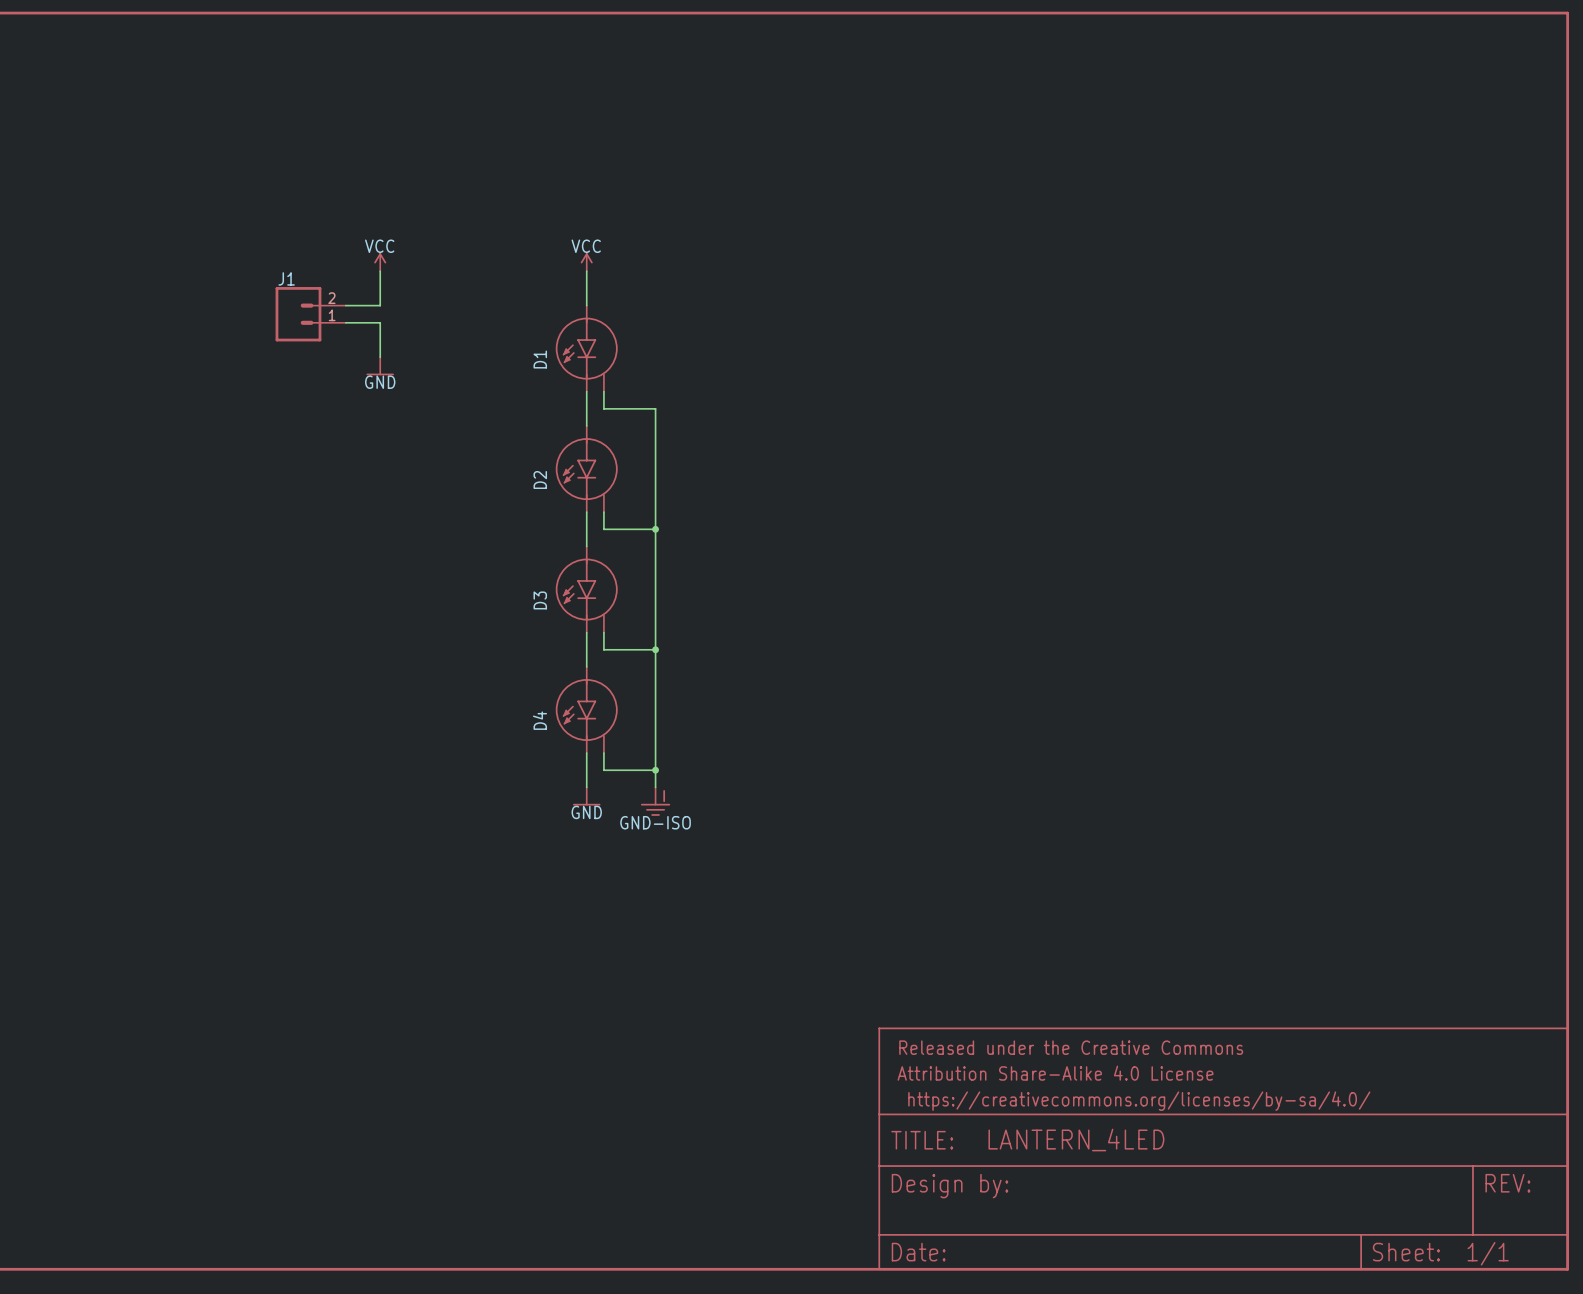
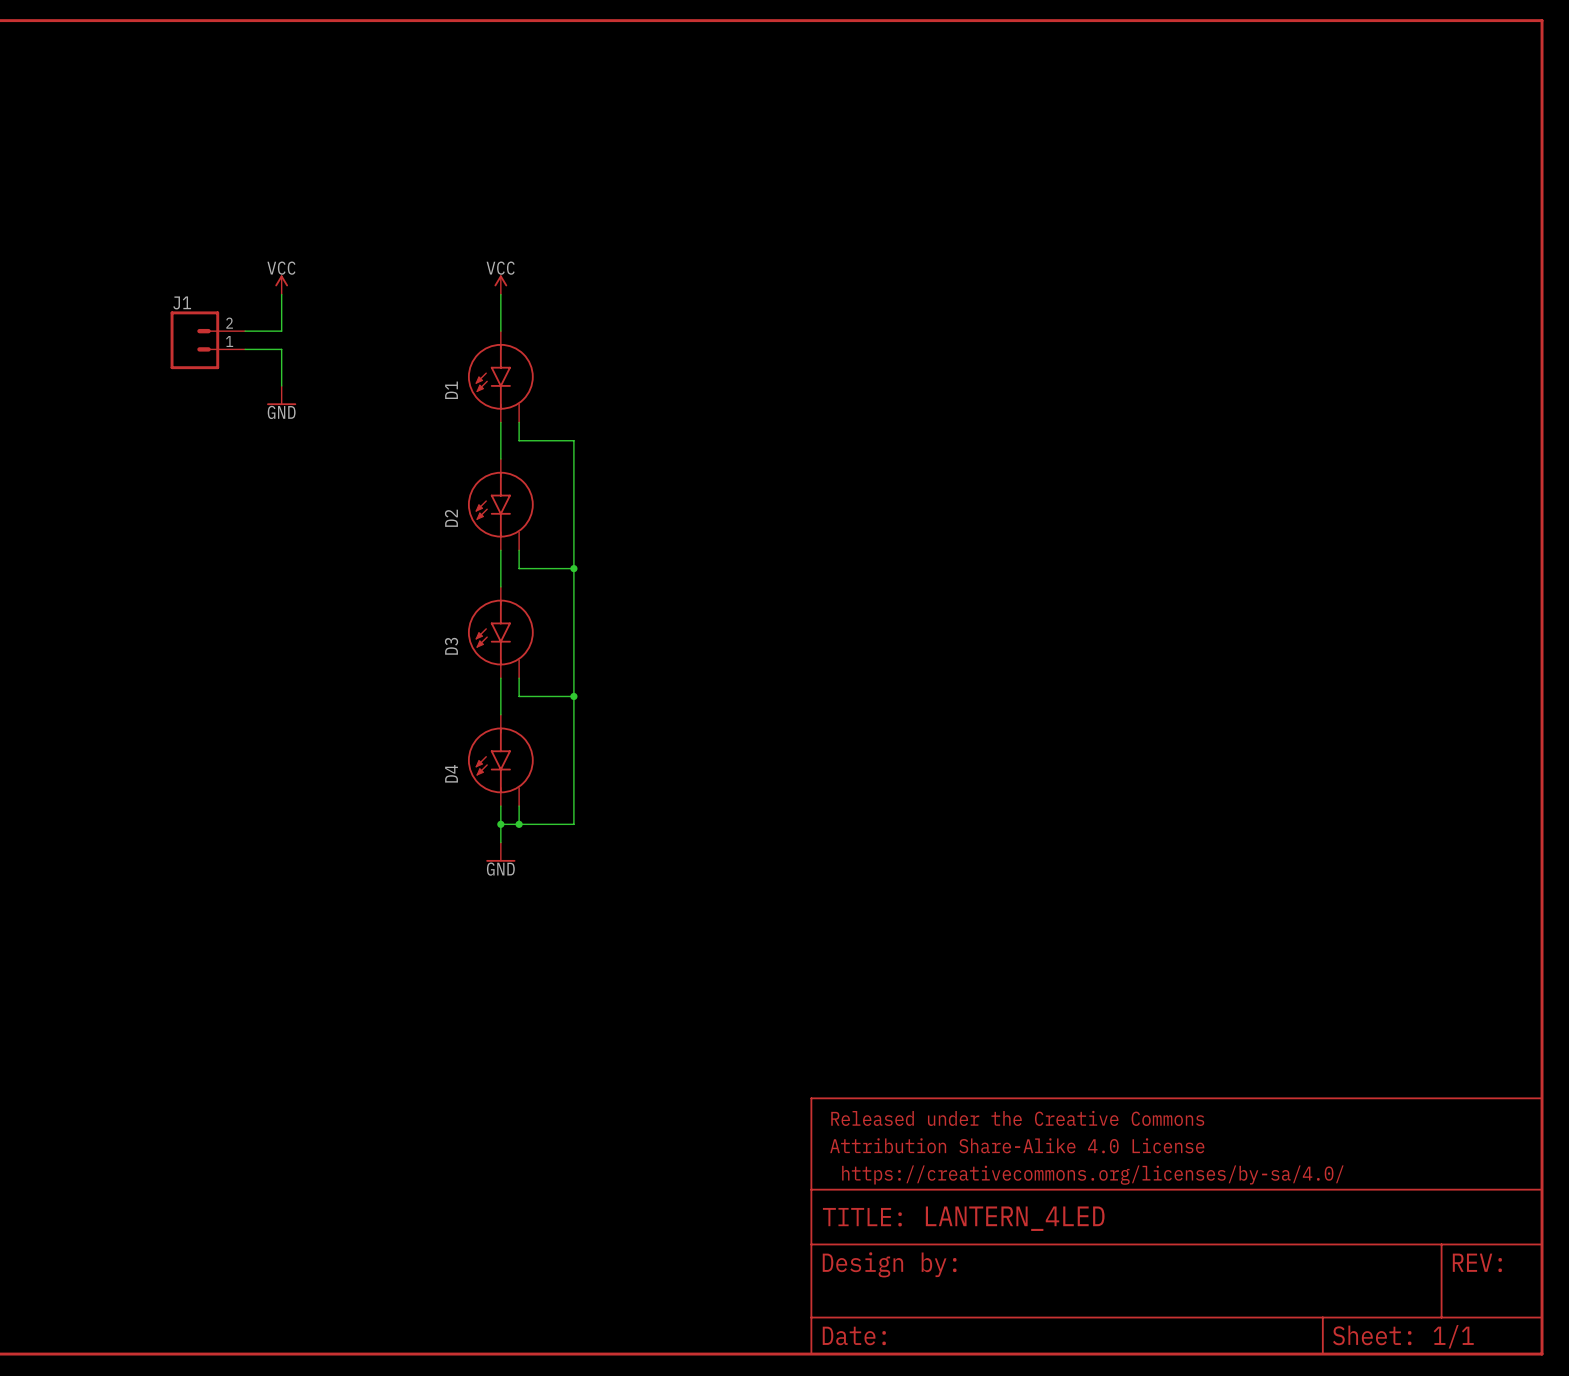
wire: none -> (500, 824) (519, 824)
junction: none -> (500, 824)
junction: none -> (519, 824)
wire: (655, 770) (655, 787) -> none
junction: (655, 770) -> none
power symbol: GND-ISO (655, 801) -> none

